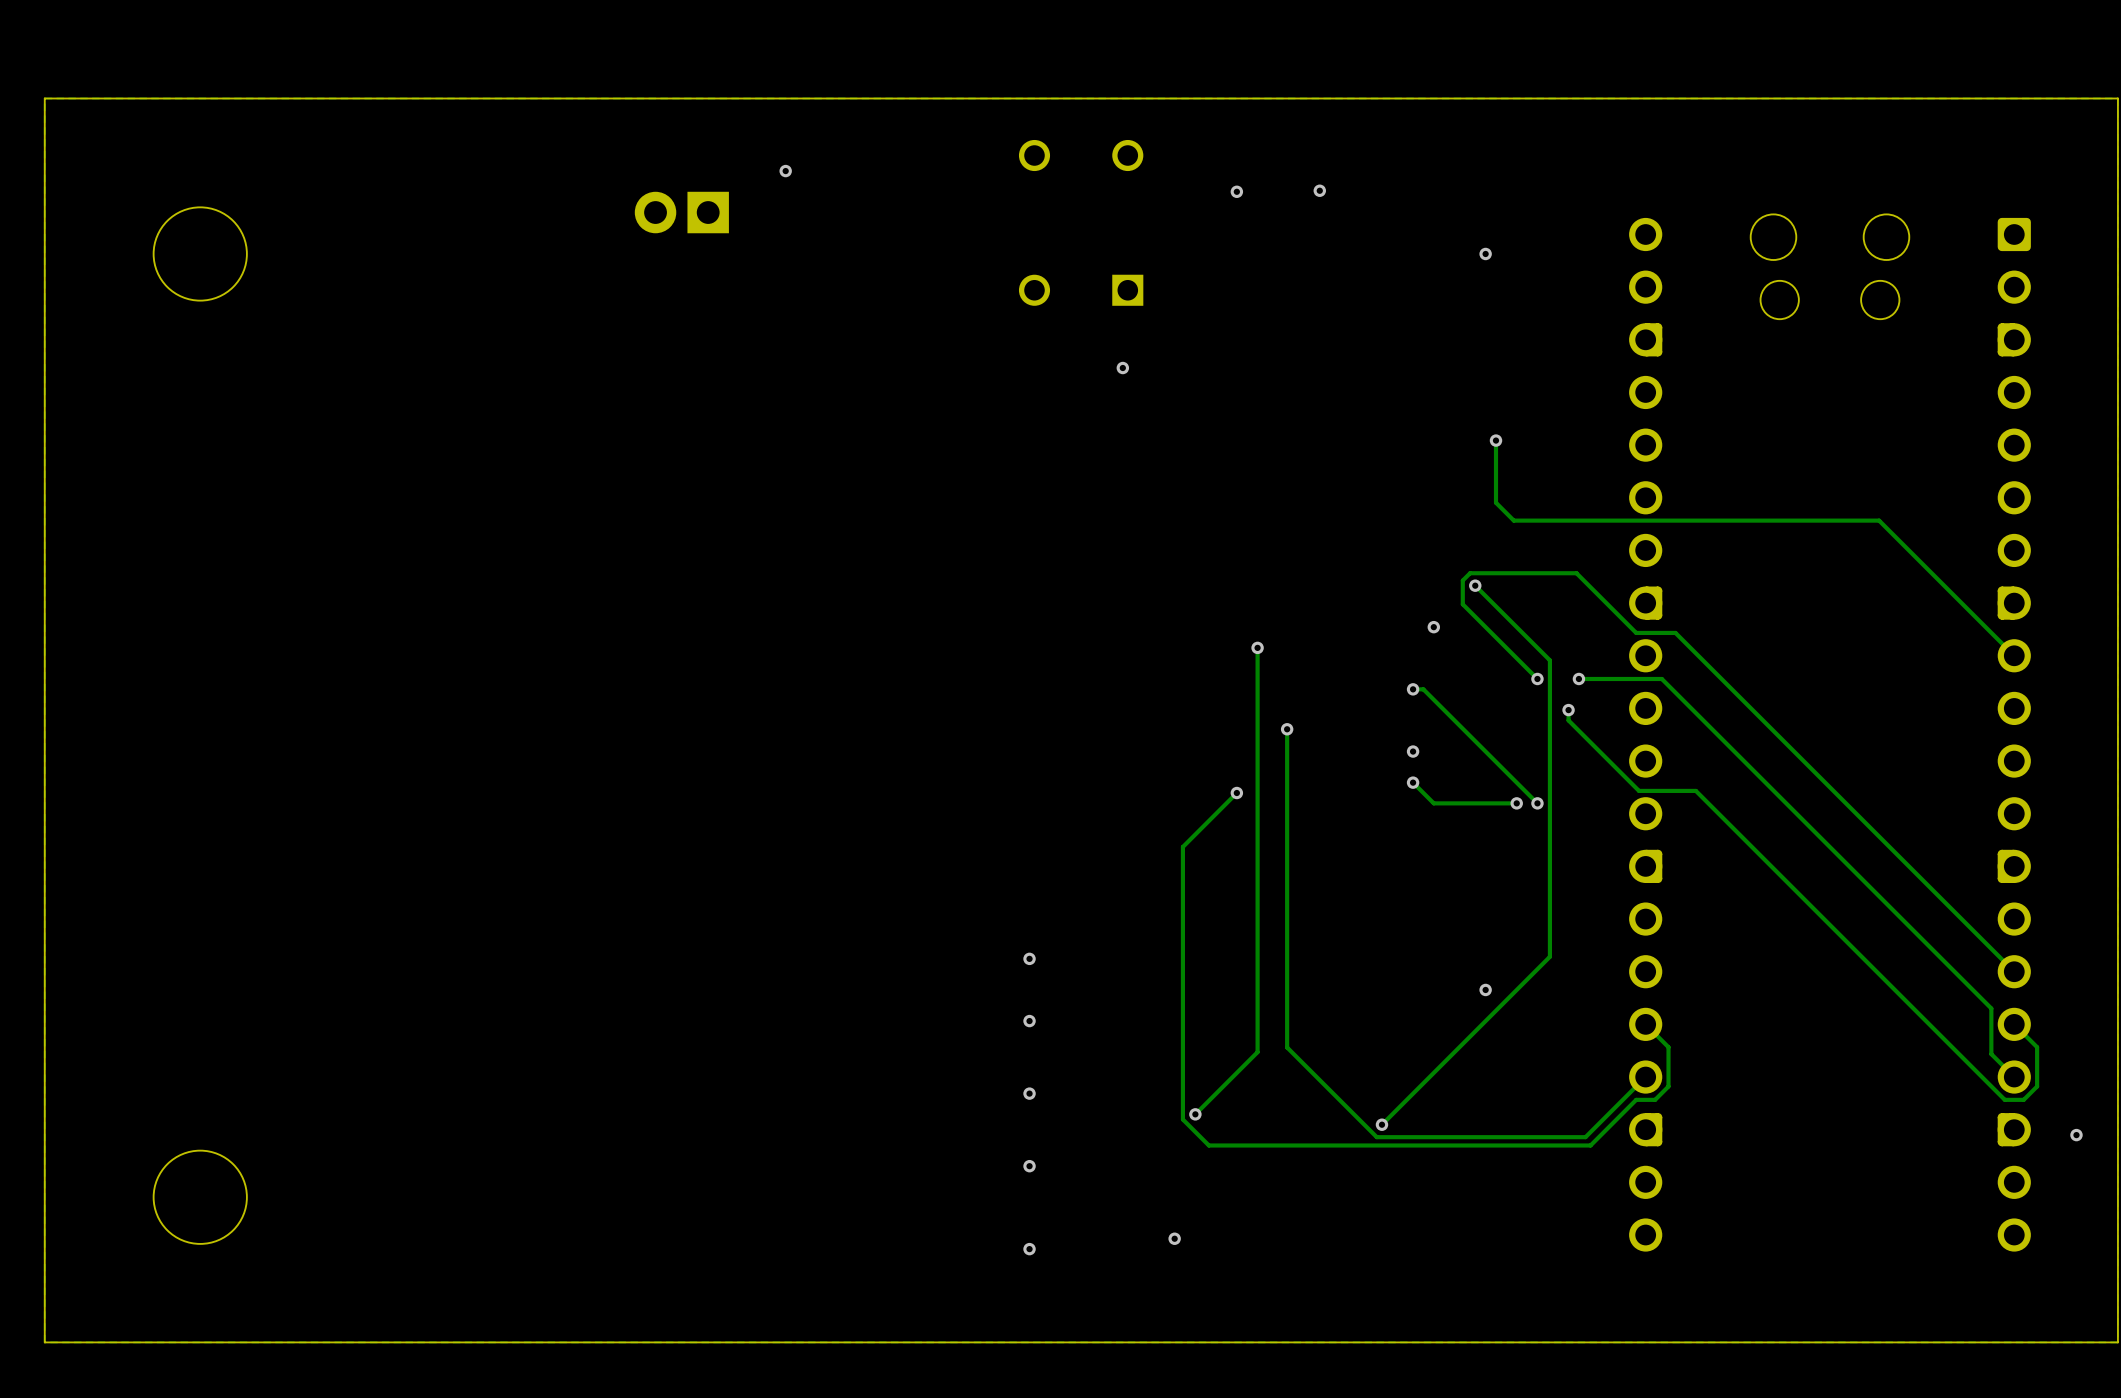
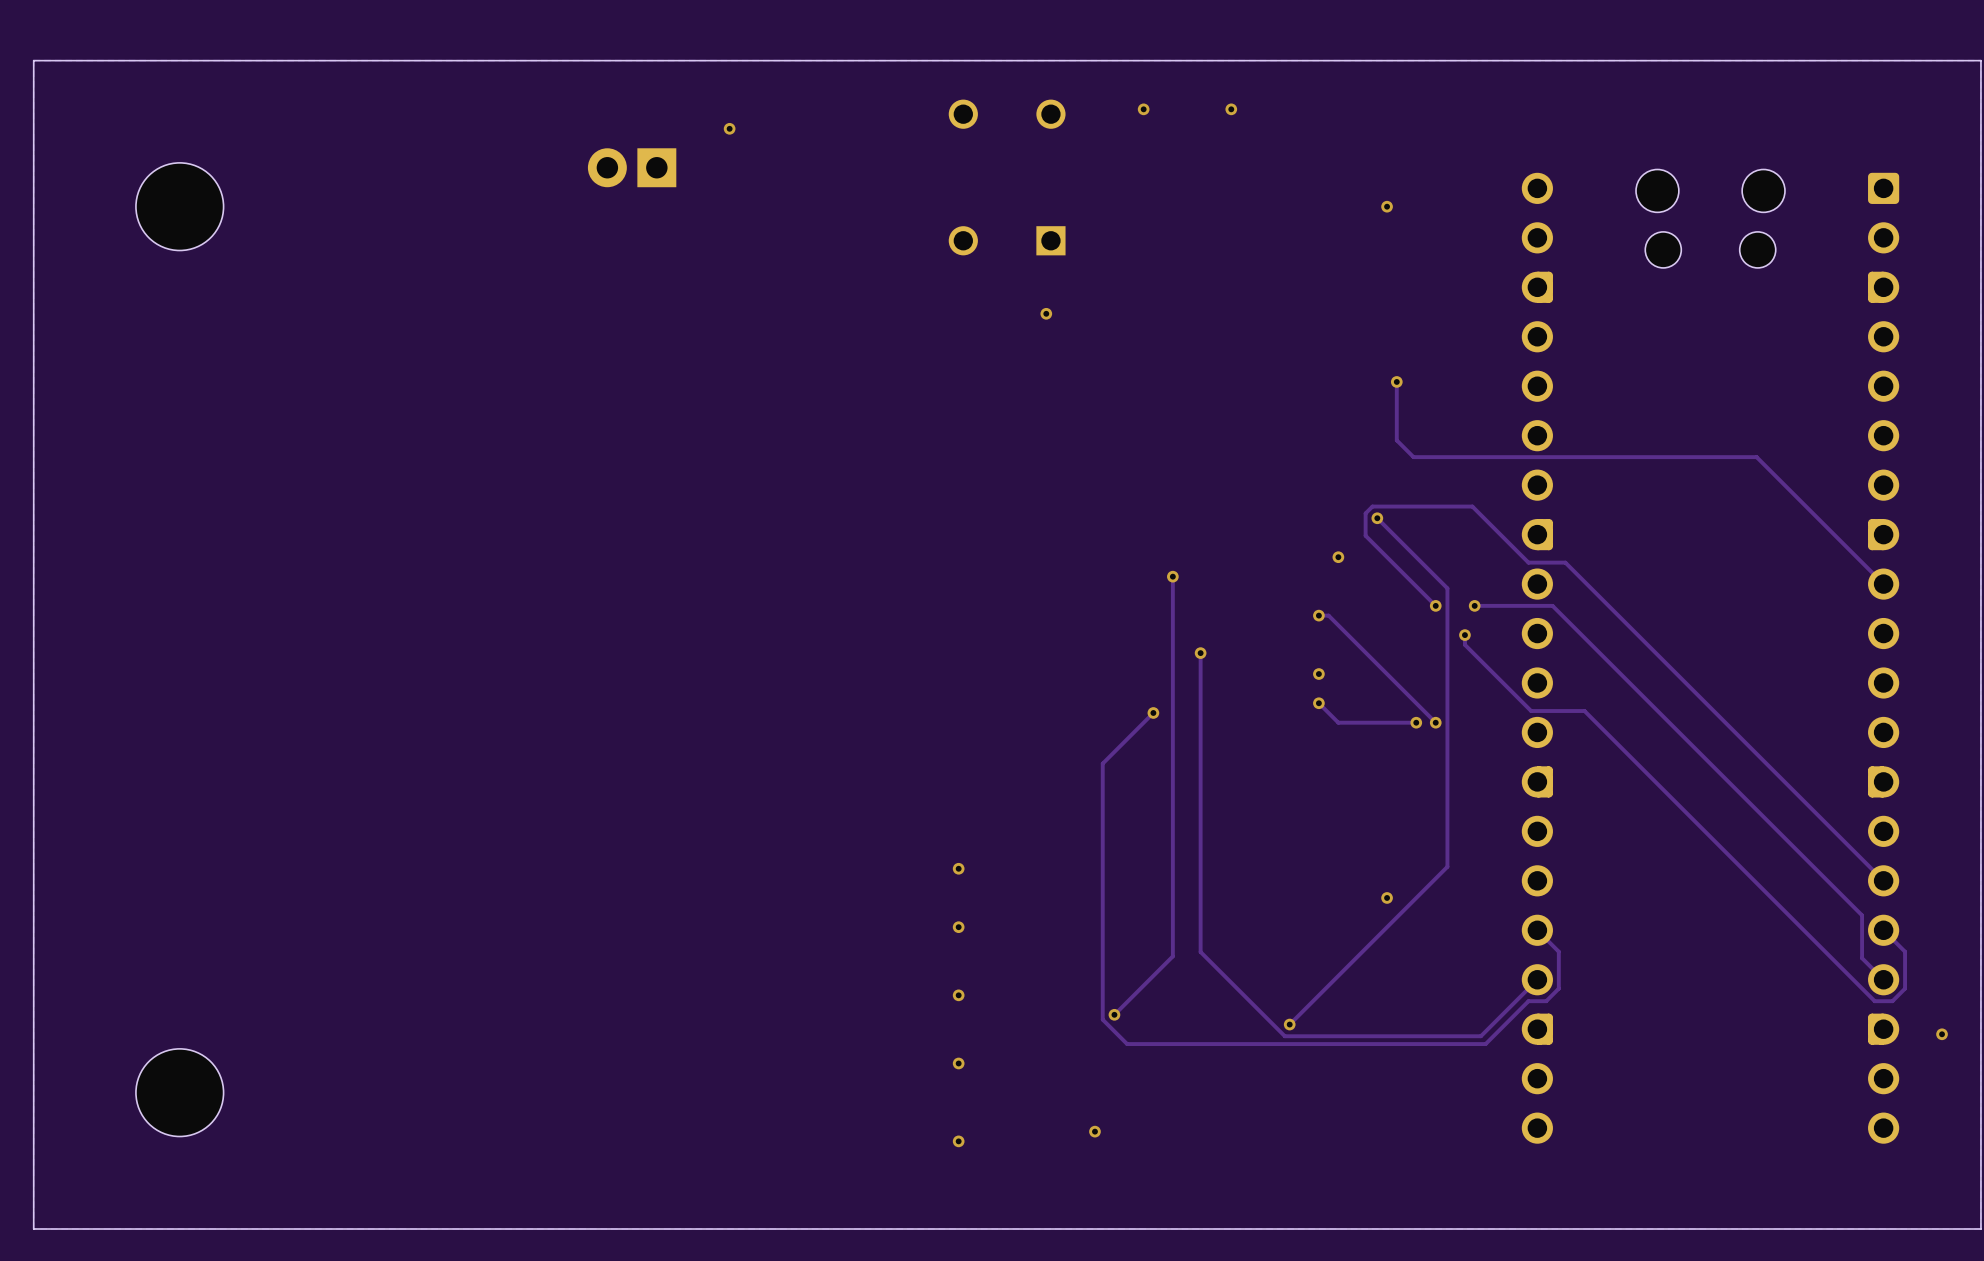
via position: (1319, 190) -> (1231, 109)
via position: (1236, 191) -> (1143, 109)

